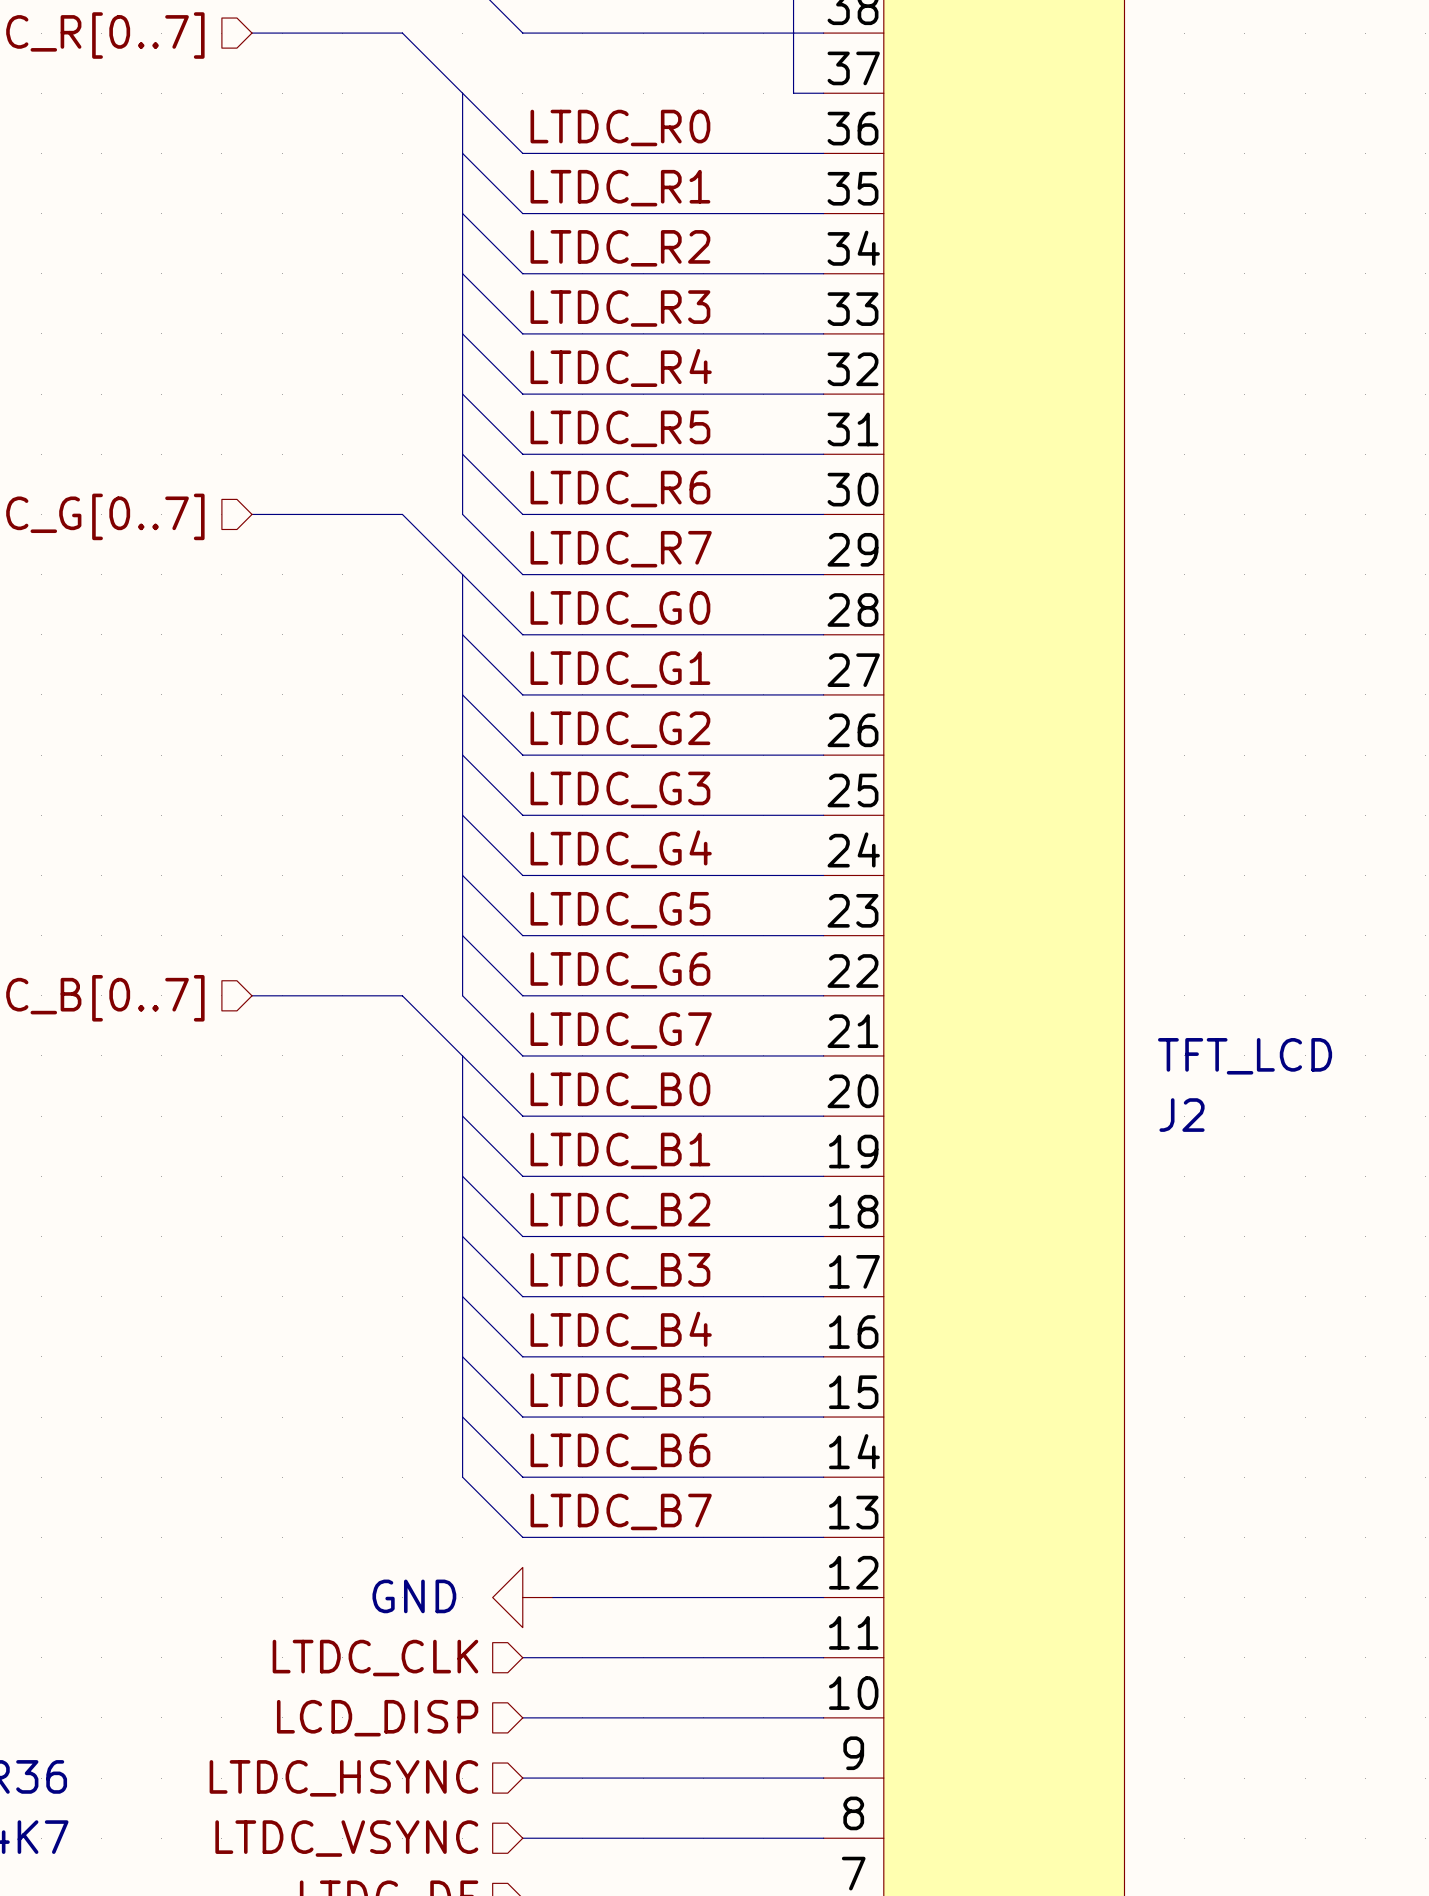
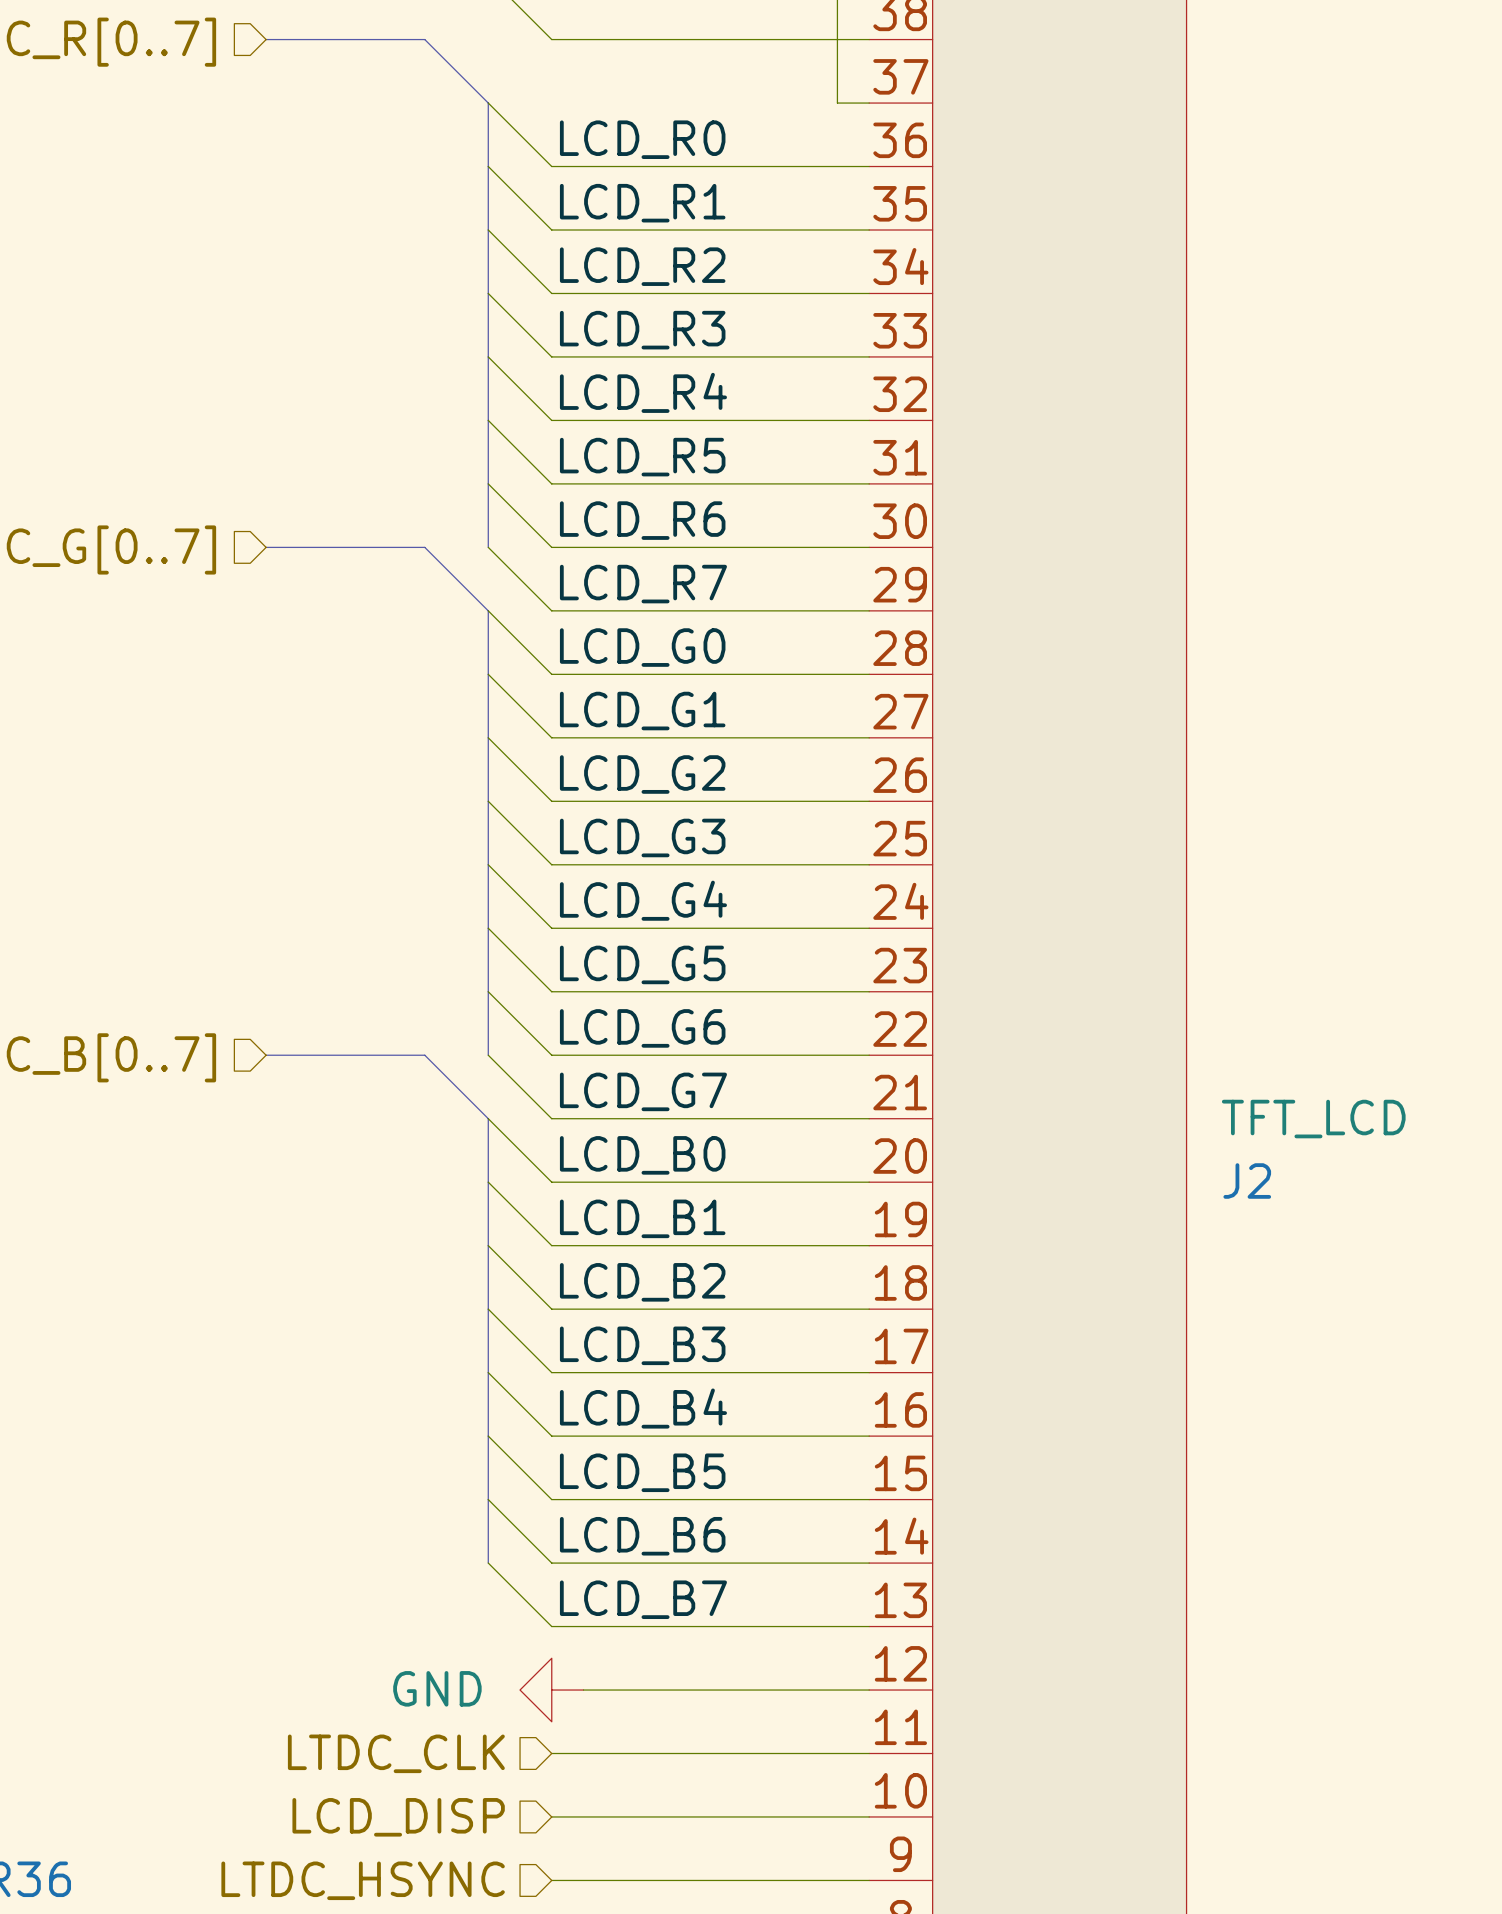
label: LTDC_R0 (620, 127) -> LCD_R0 (642, 139)
label: LTDC_R1 (620, 188) -> LCD_R1 (642, 203)
label: LTDC_R2 (620, 248) -> LCD_R2 (642, 266)
label: LTDC_R3 (620, 308) -> LCD_R3 (642, 330)
label: LTDC_R4 (621, 367) -> LCD_R4 (643, 392)
label: LTDC_R5 (620, 428) -> LCD_R5 (642, 457)
label: LTDC_R6 (620, 489) -> LCD_R6 (642, 520)
label: LTDC_R7 (621, 549) -> LCD_R7 (643, 584)
label: LTDC_G0 (620, 609) -> LCD_G0 (642, 647)
label: LTDC_G1 (620, 669) -> LCD_G1 (642, 711)
label: LTDC_G2 (620, 729) -> LCD_G2 (642, 774)
label: LTDC_G3 (620, 789) -> LCD_G3 (642, 837)
label: LTDC_G4 (621, 849) -> LCD_G4 (643, 900)
label: LTDC_G5 (620, 910) -> LCD_G5 (642, 964)
label: LTDC_G6 (620, 970) -> LCD_G6 (642, 1028)
label: LTDC_G7 (621, 1030) -> LCD_G7 (643, 1091)
label: LTDC_B0 (620, 1090) -> LCD_B0 (642, 1155)
label: LTDC_B1 (620, 1150) -> LCD_B1 (642, 1218)
label: LTDC_B2 (620, 1211) -> LCD_B2 (642, 1282)
label: LTDC_B3 (620, 1271) -> LCD_B3 (642, 1345)
label: LTDC_B4 (621, 1330) -> LCD_B4 (643, 1408)
label: LTDC_B5 (620, 1391) -> LCD_B5 (642, 1472)
label: LTDC_B6 (620, 1451) -> LCD_B6 (642, 1536)
label: LTDC_B7 (621, 1511) -> LCD_B7 (643, 1599)

